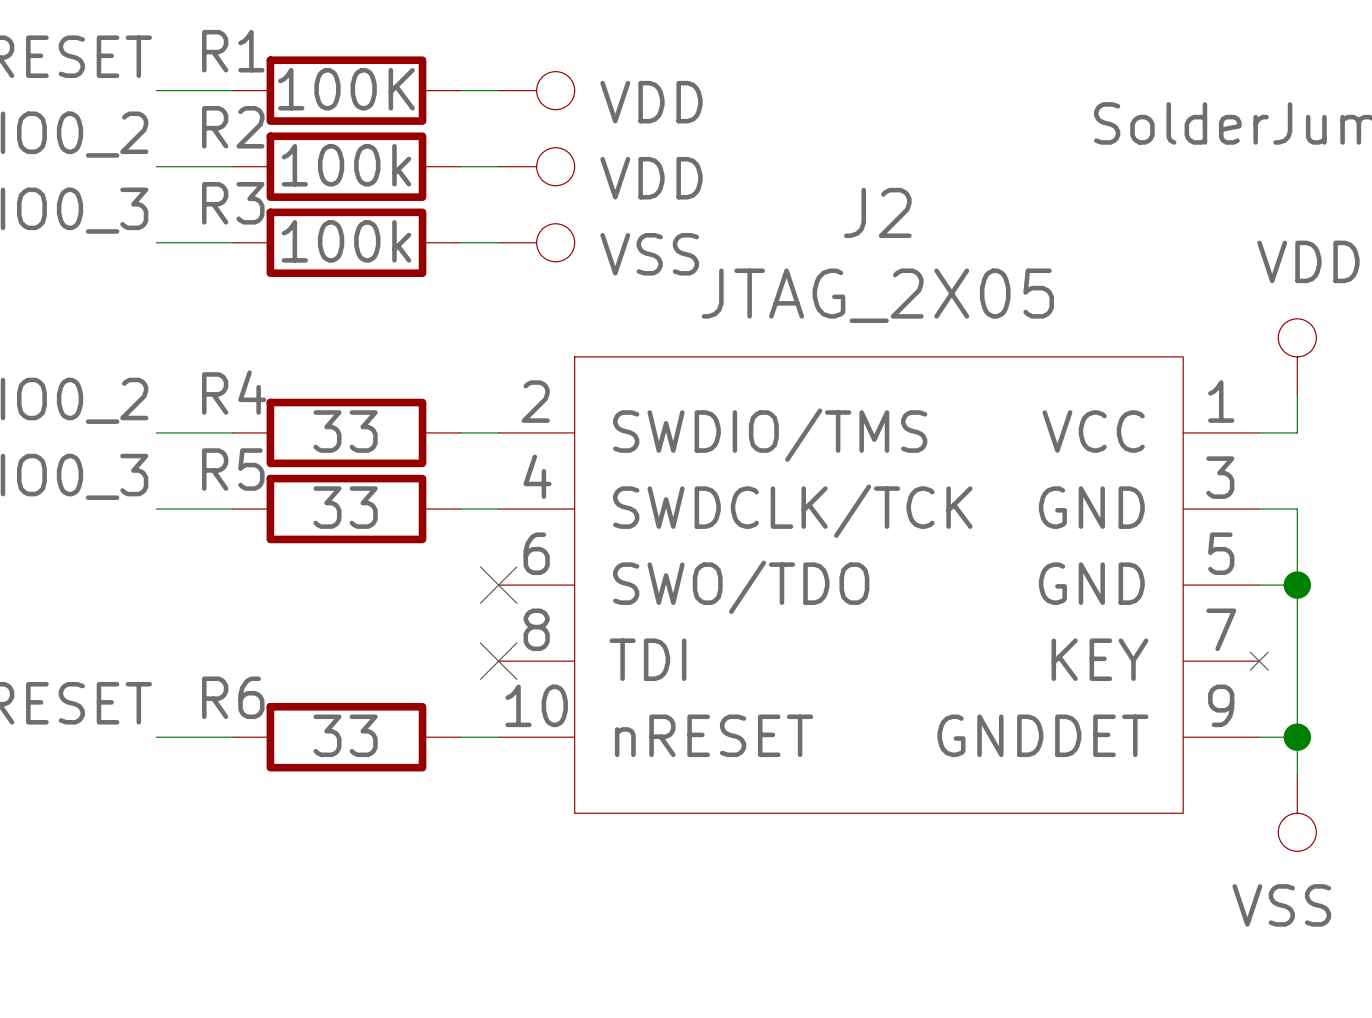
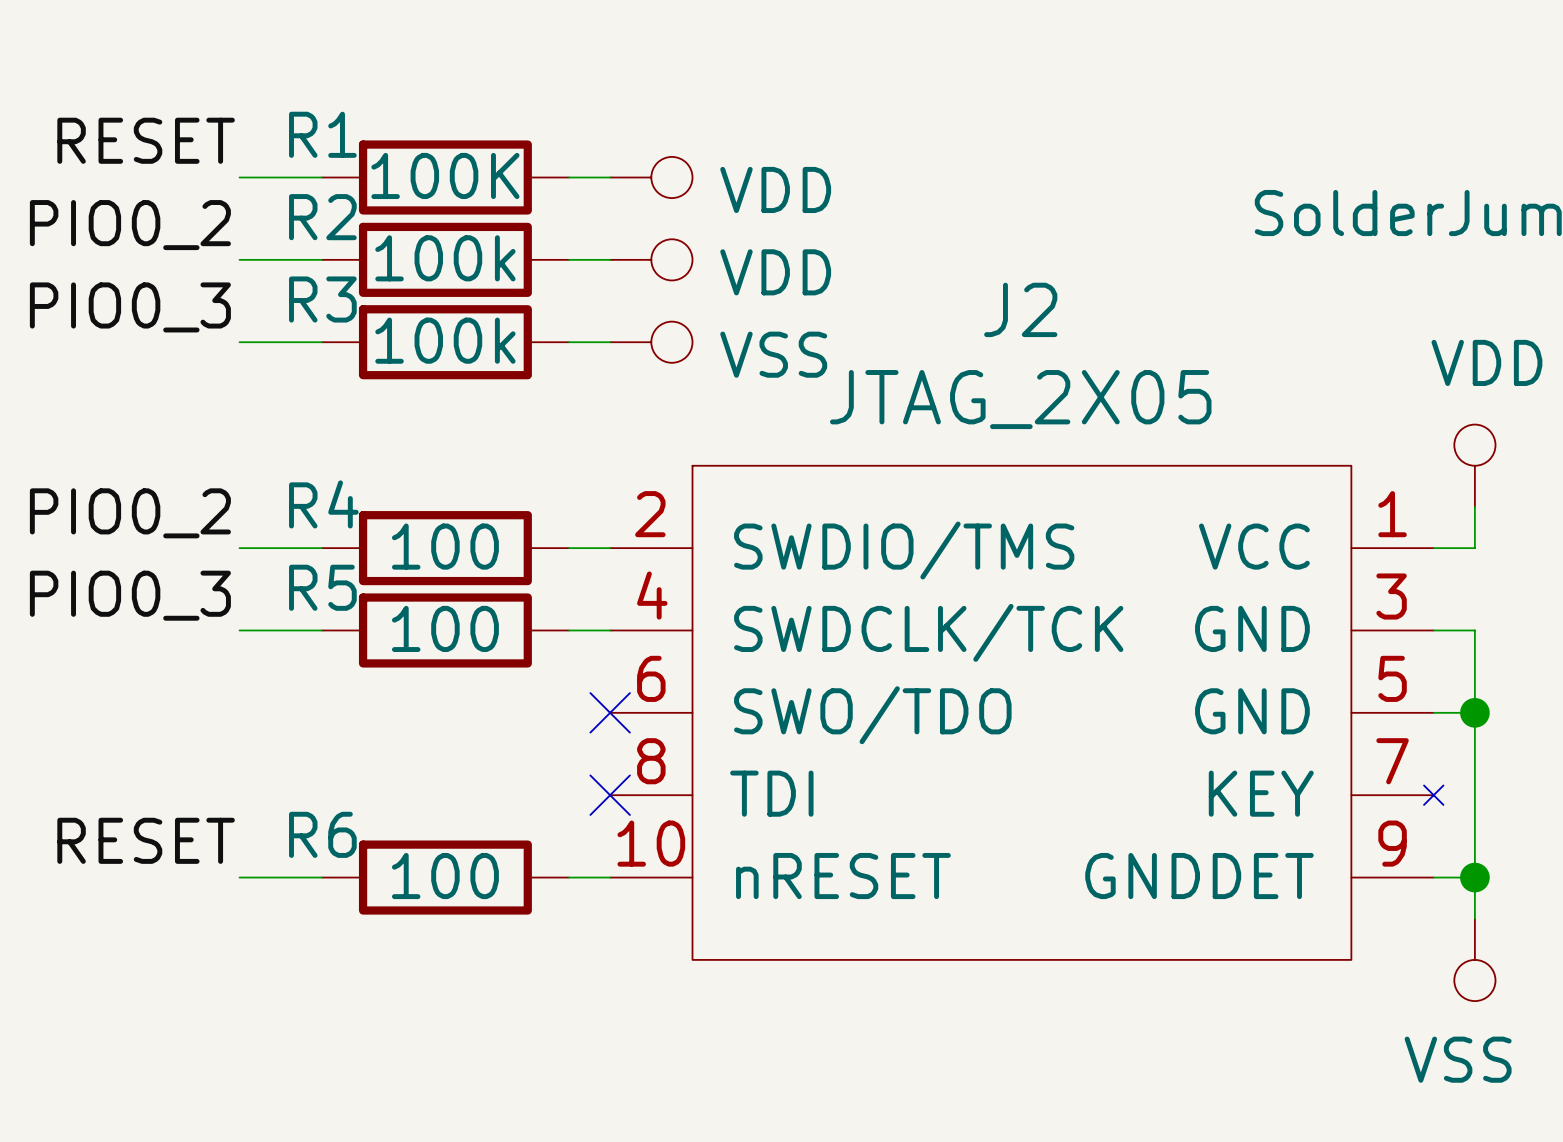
R4 value: 33 (345, 431) -> 100 (445, 546)
R5 value: 33 (345, 507) -> 100 (445, 628)
R6 value: 33 (345, 735) -> 100 (445, 876)

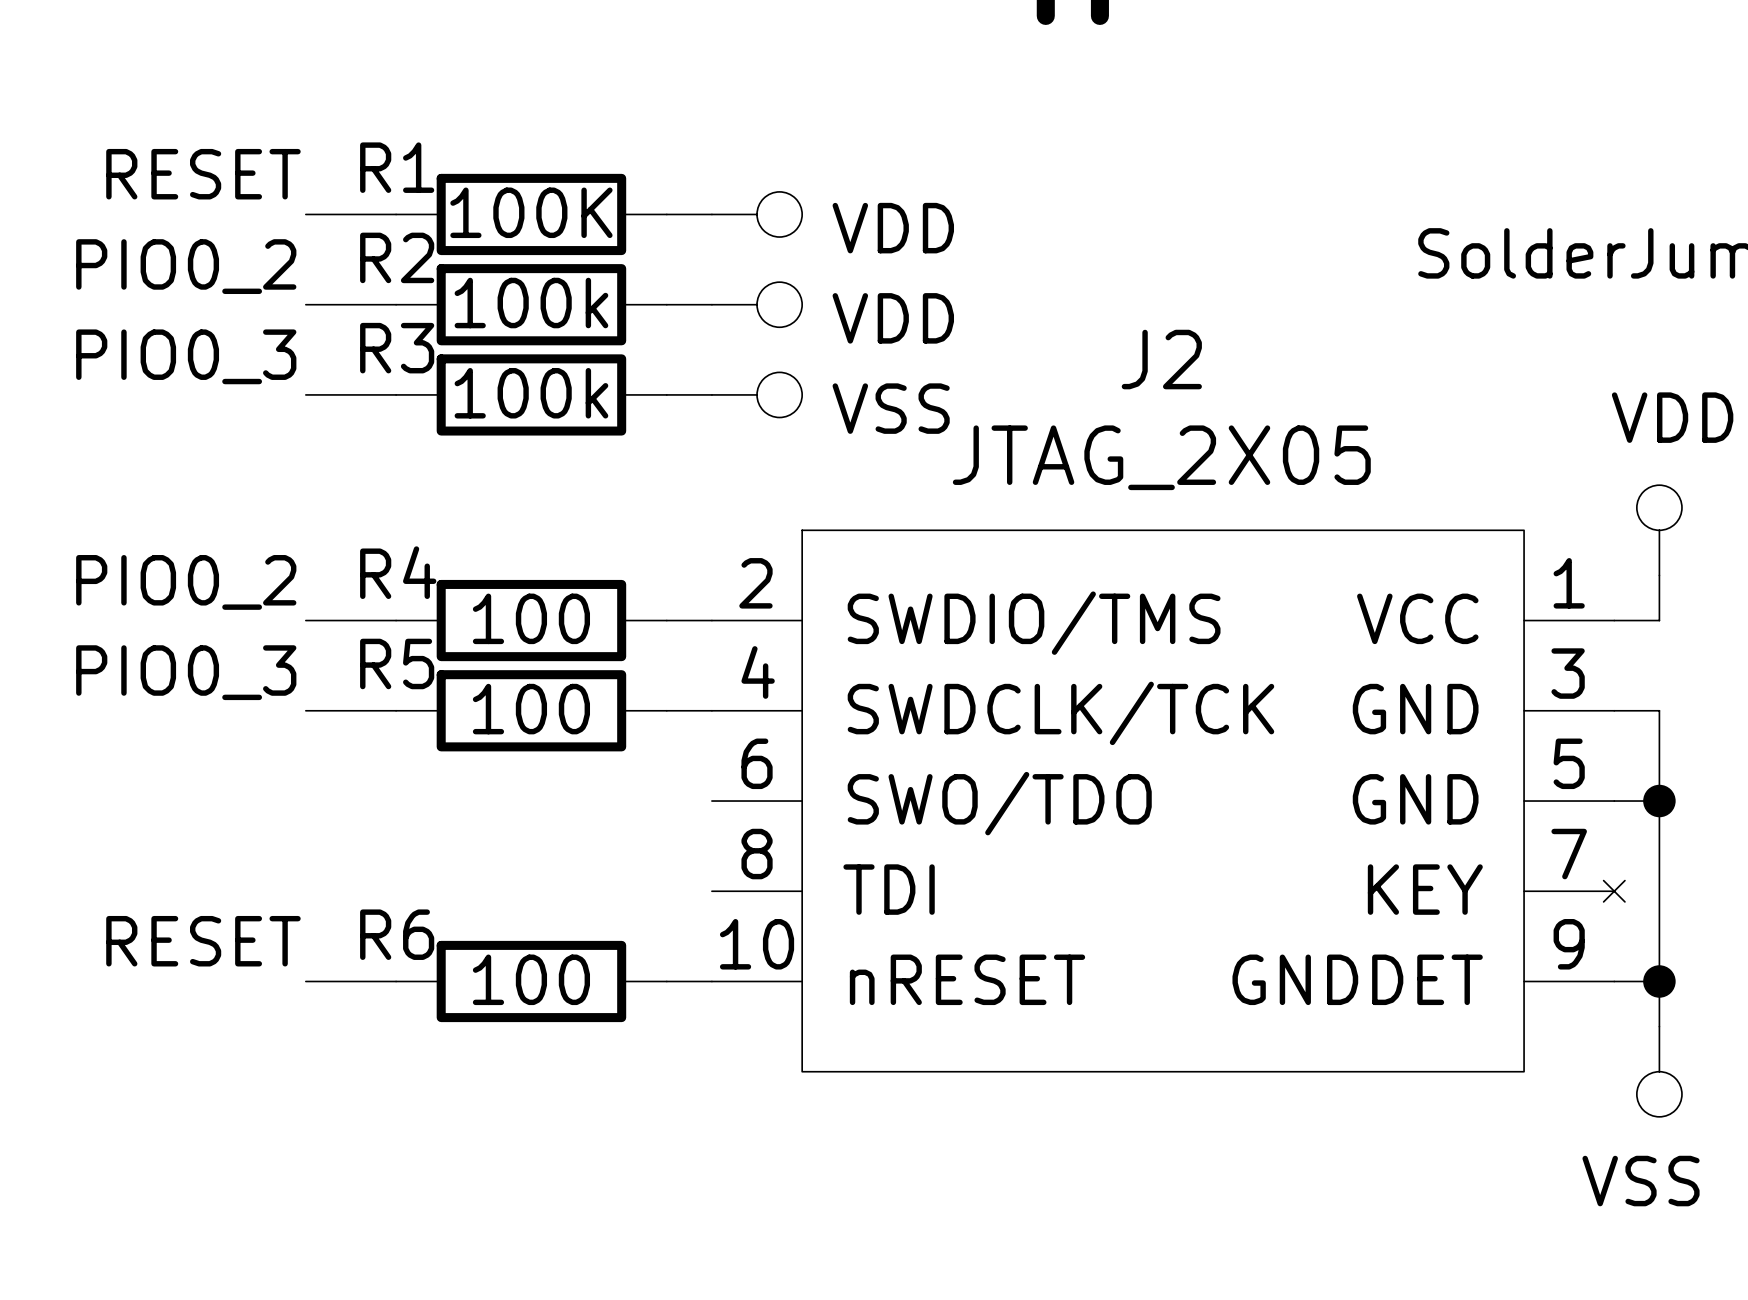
no-connect mark: (610, 712) -> none
no-connect mark: (610, 795) -> none

